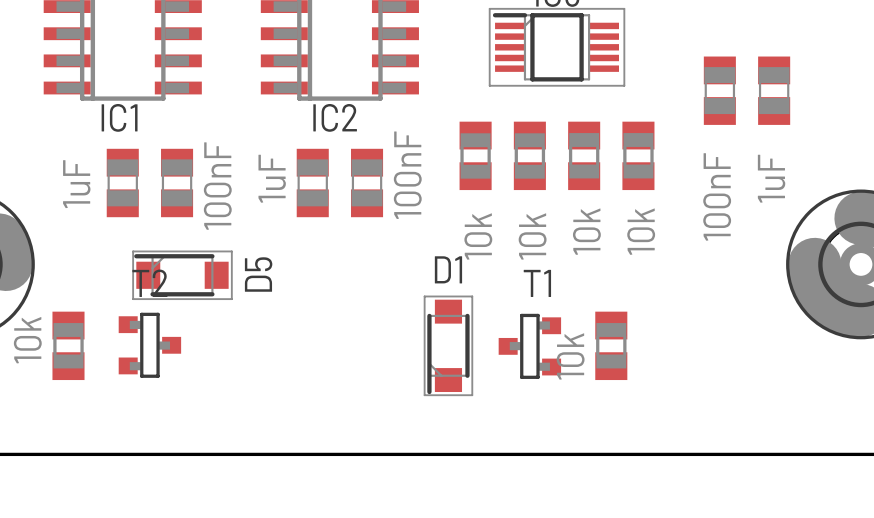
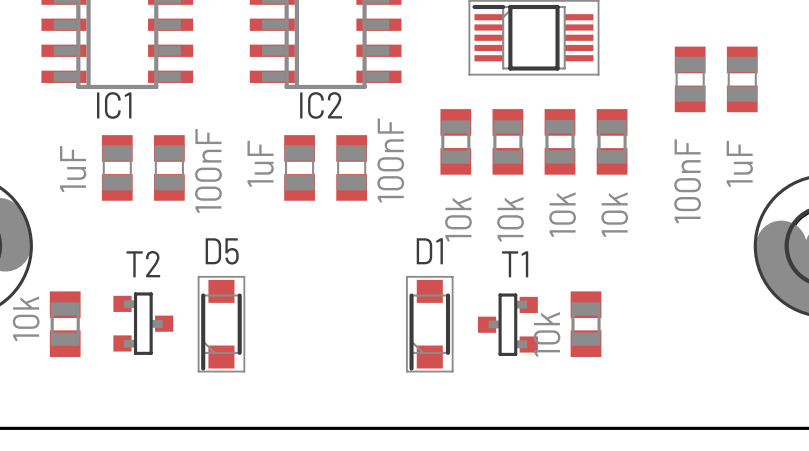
D5 rotation: 0° (182, 275) -> 90° counterclockwise (221, 324)
D5 position: (182, 275) -> (221, 324)

